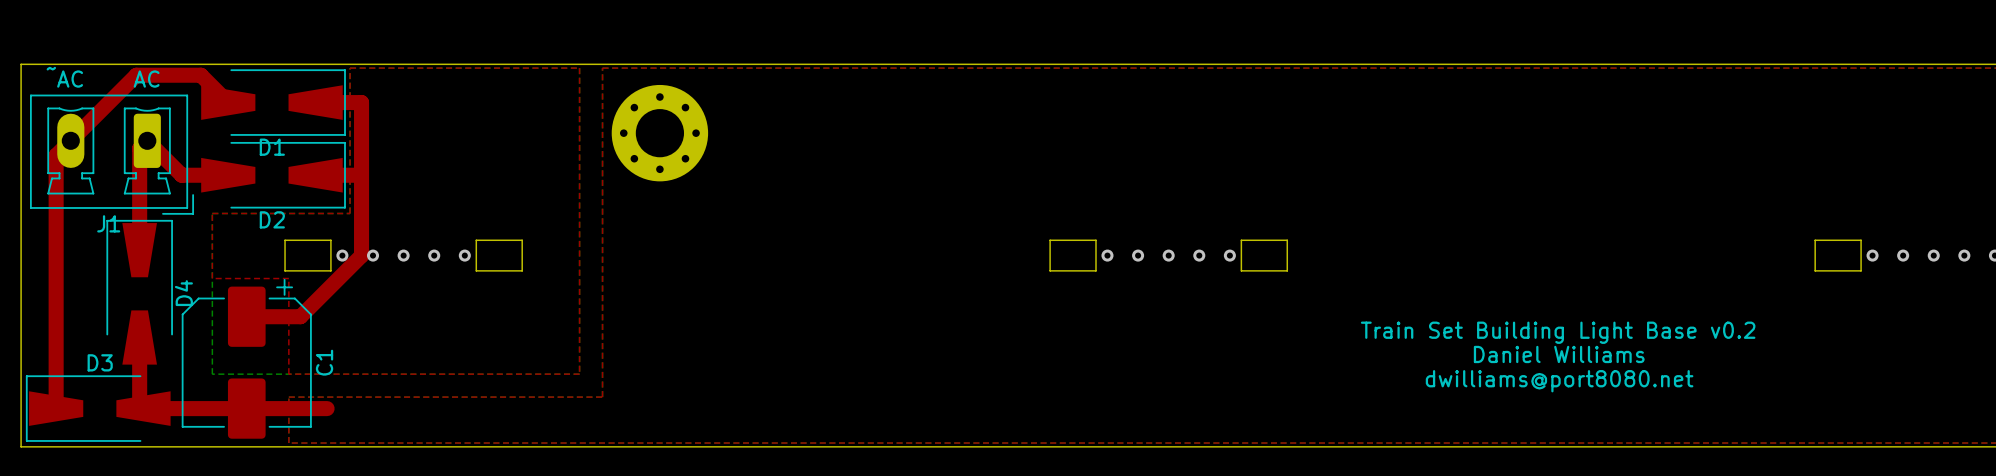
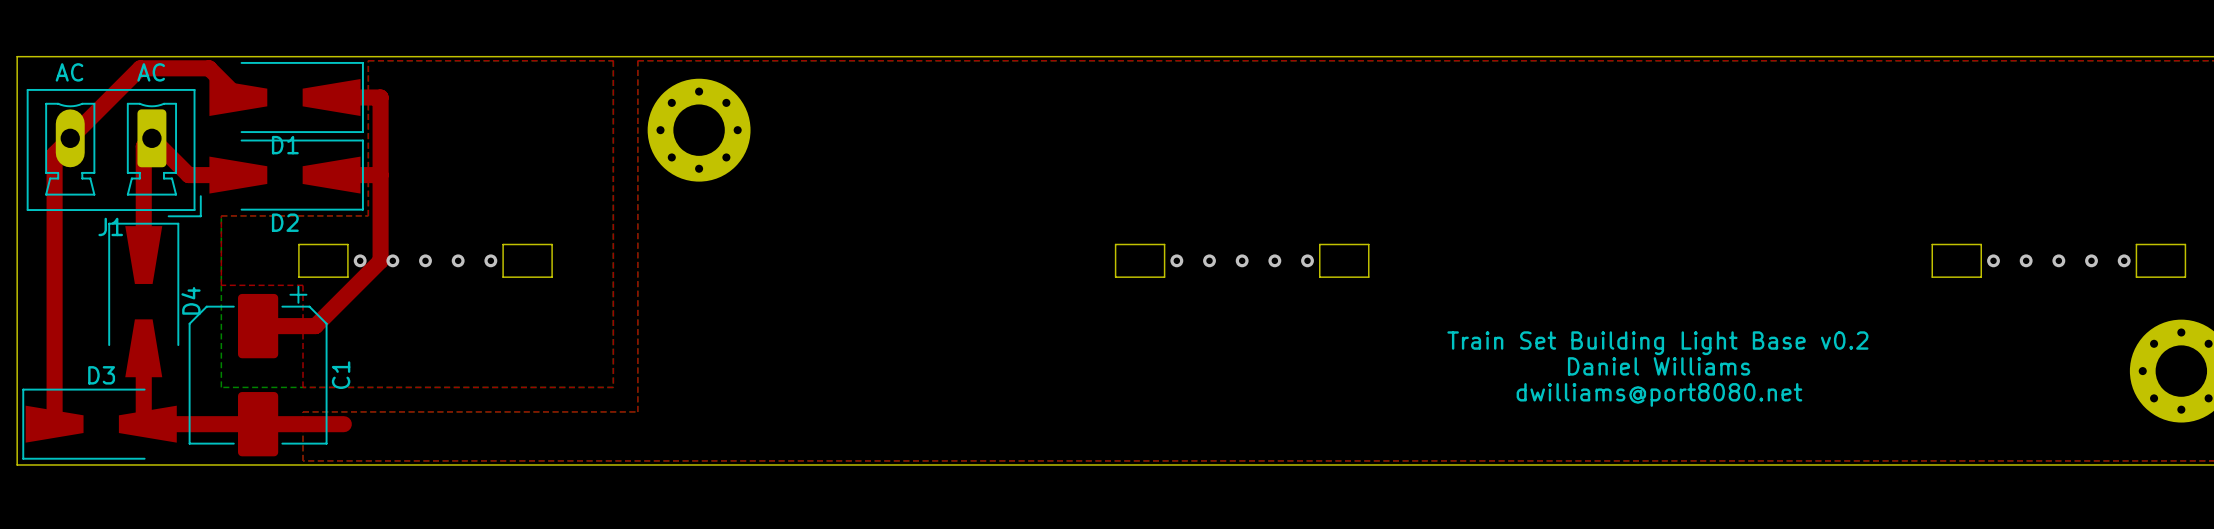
text: ~ (51, 68) -> none

